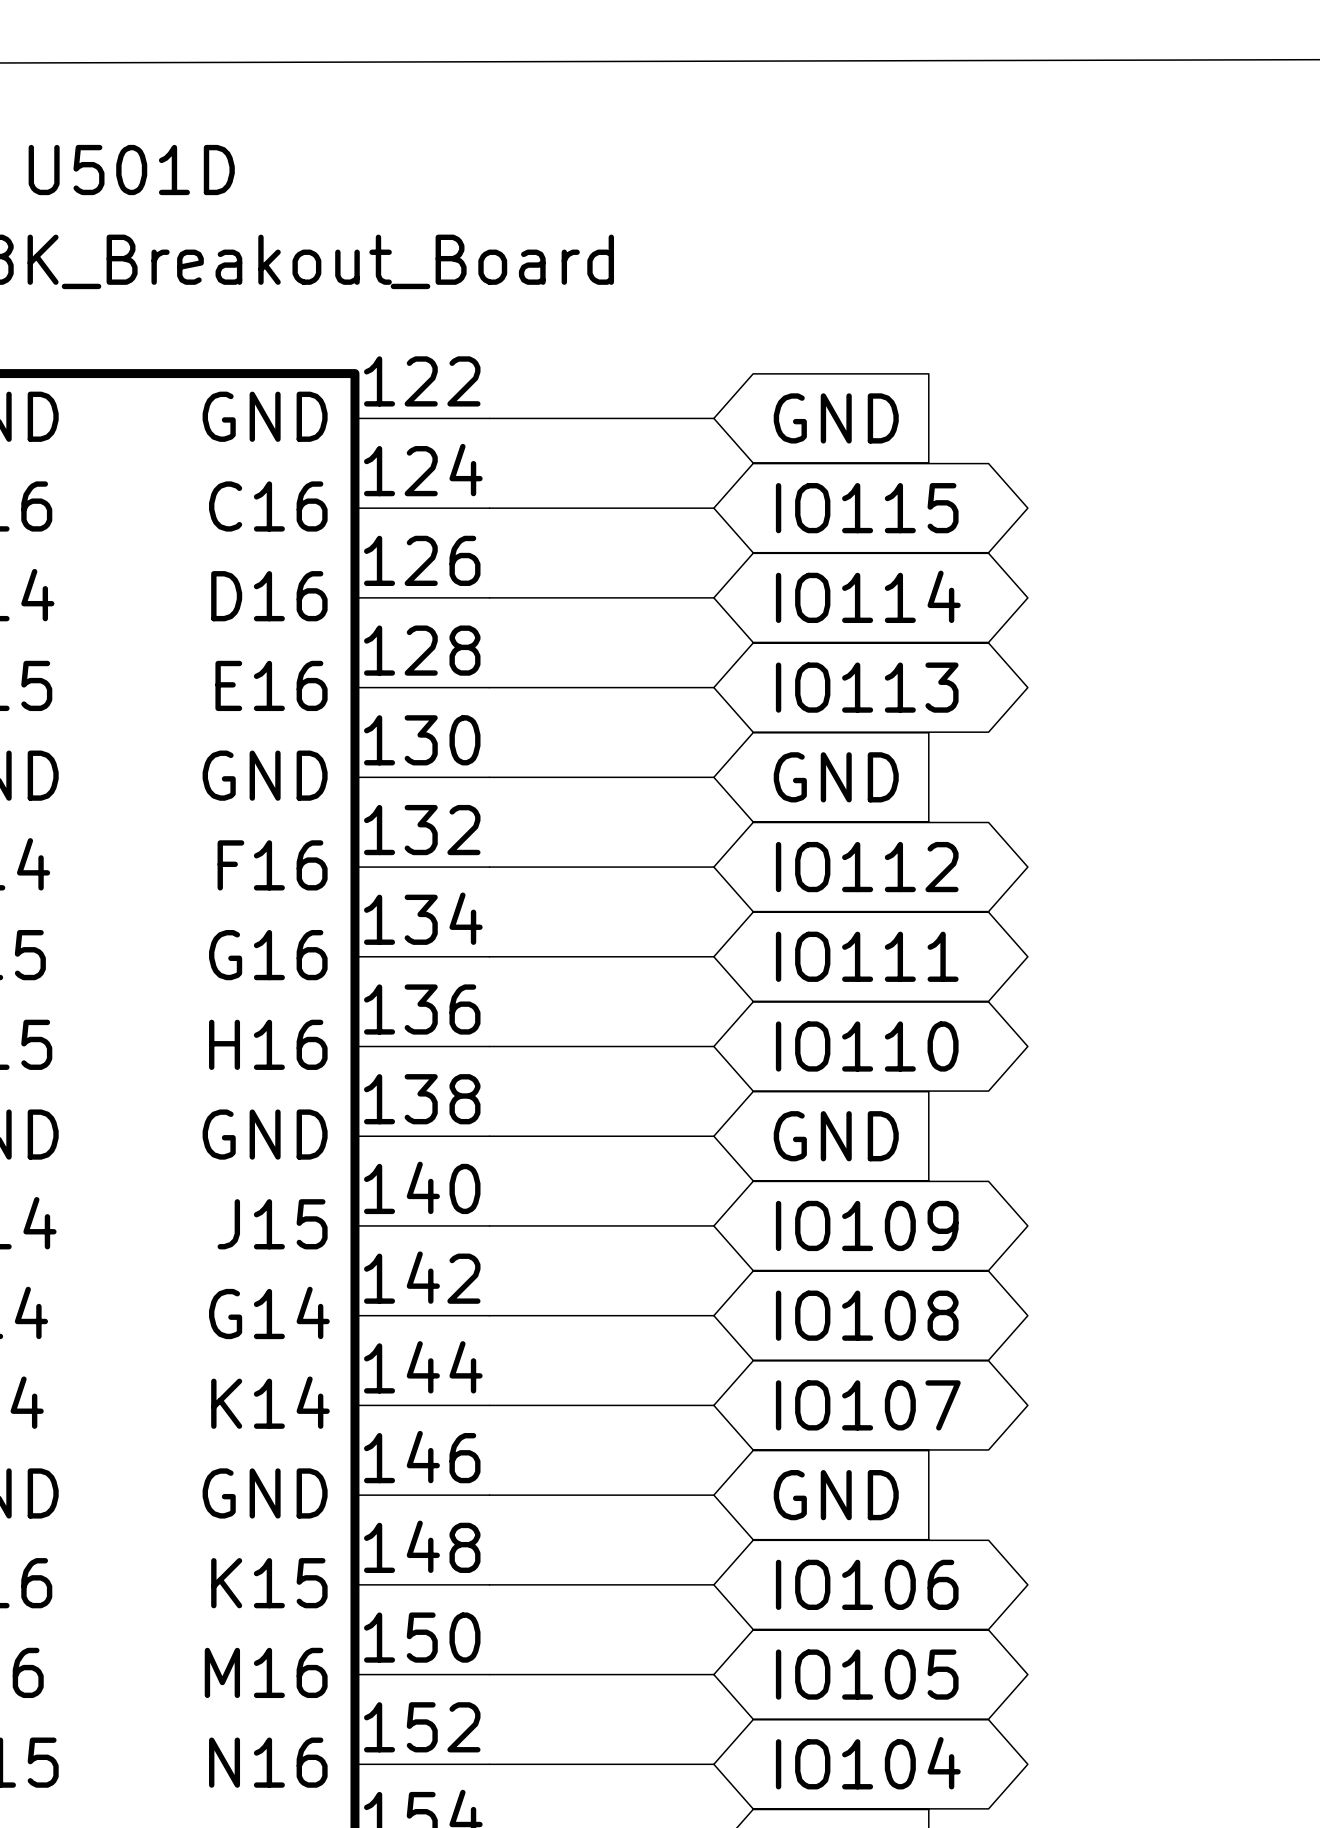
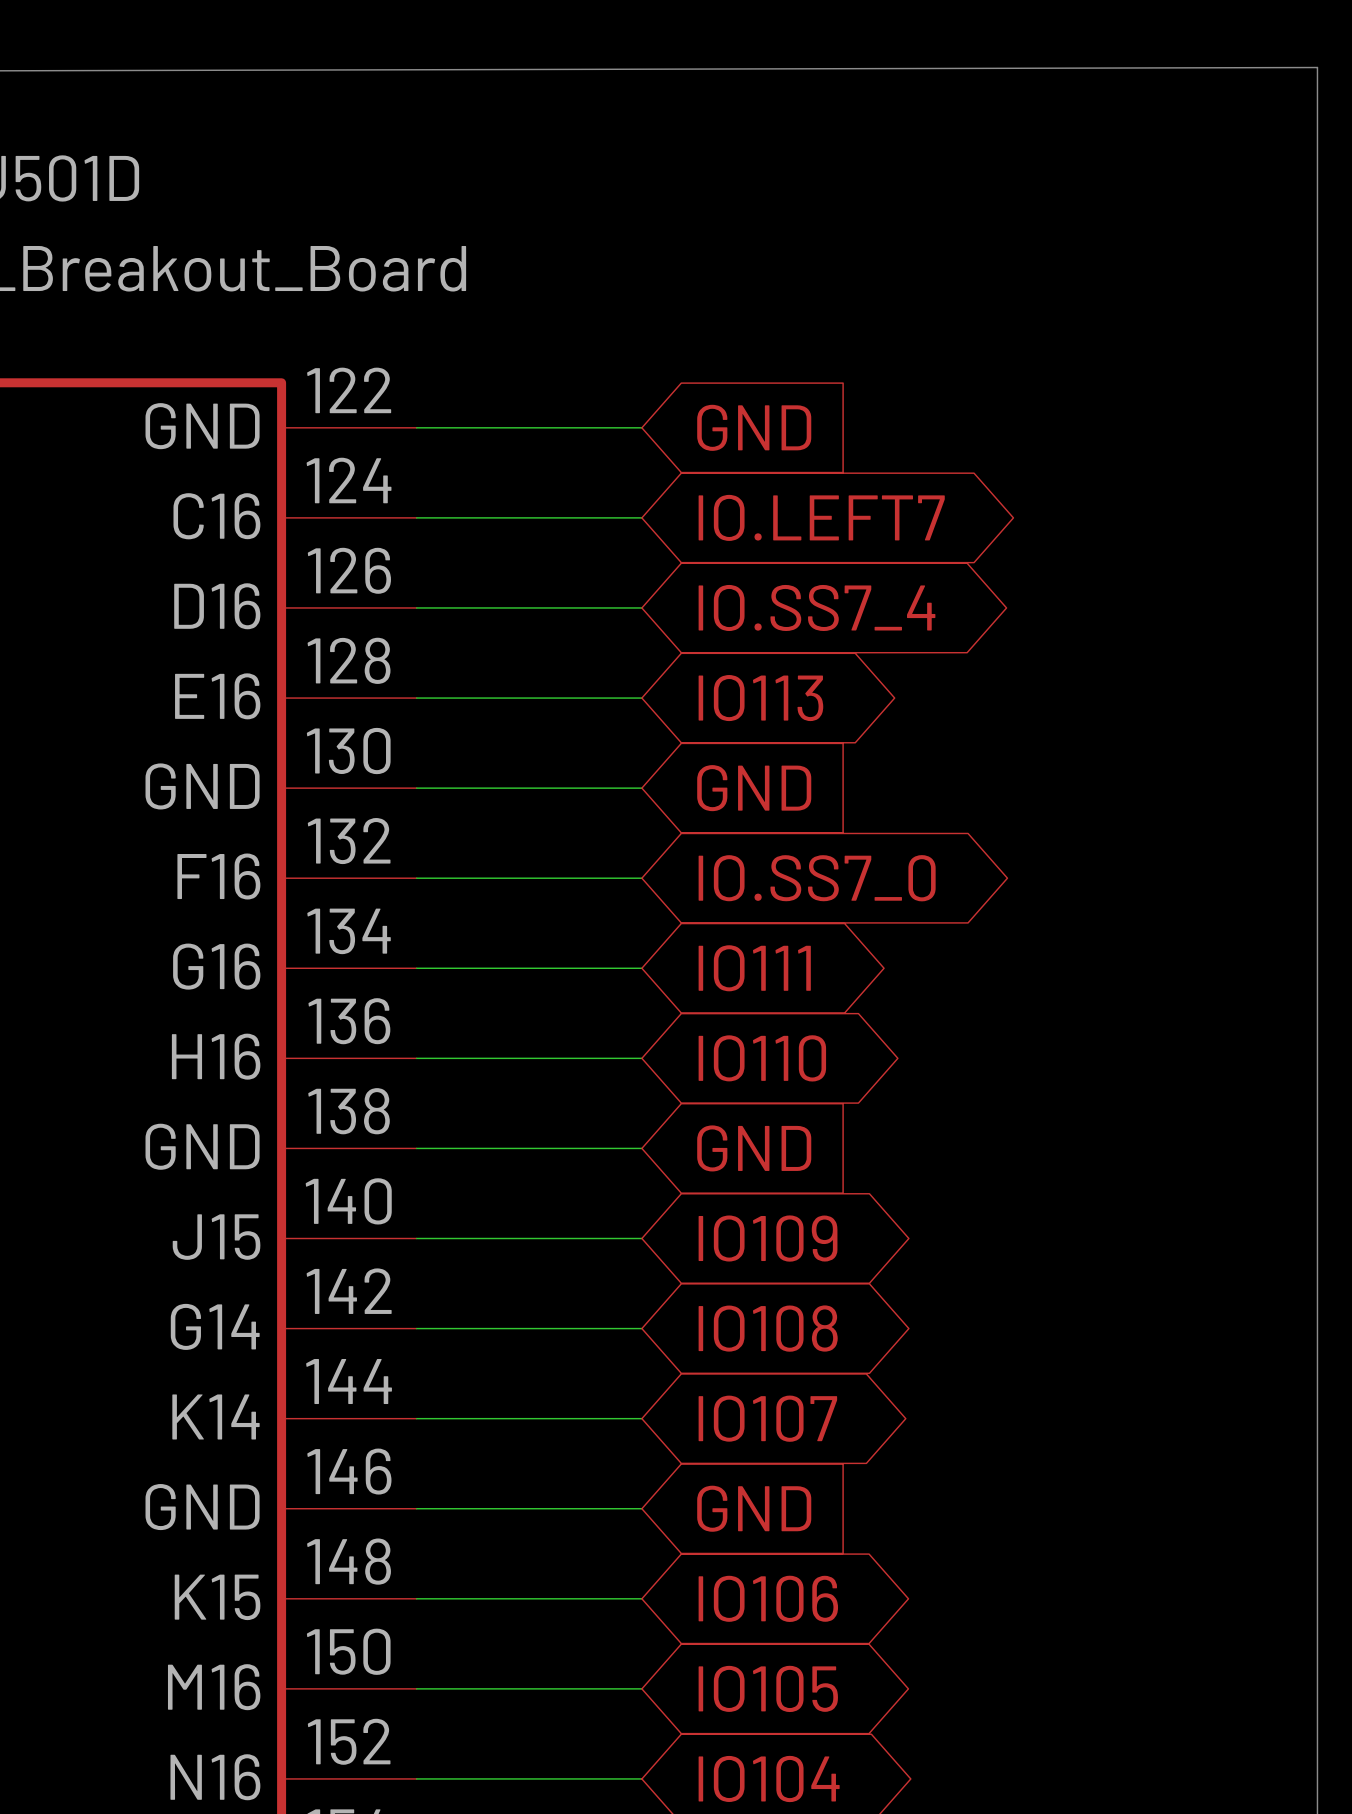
global label: IO115 (867, 508) -> IO.LEFT7 (821, 517)
global label: IO114 (868, 596) -> IO.SS7_4 (816, 607)
global label: IO112 (867, 867) -> IO.SS7_0 (817, 878)

